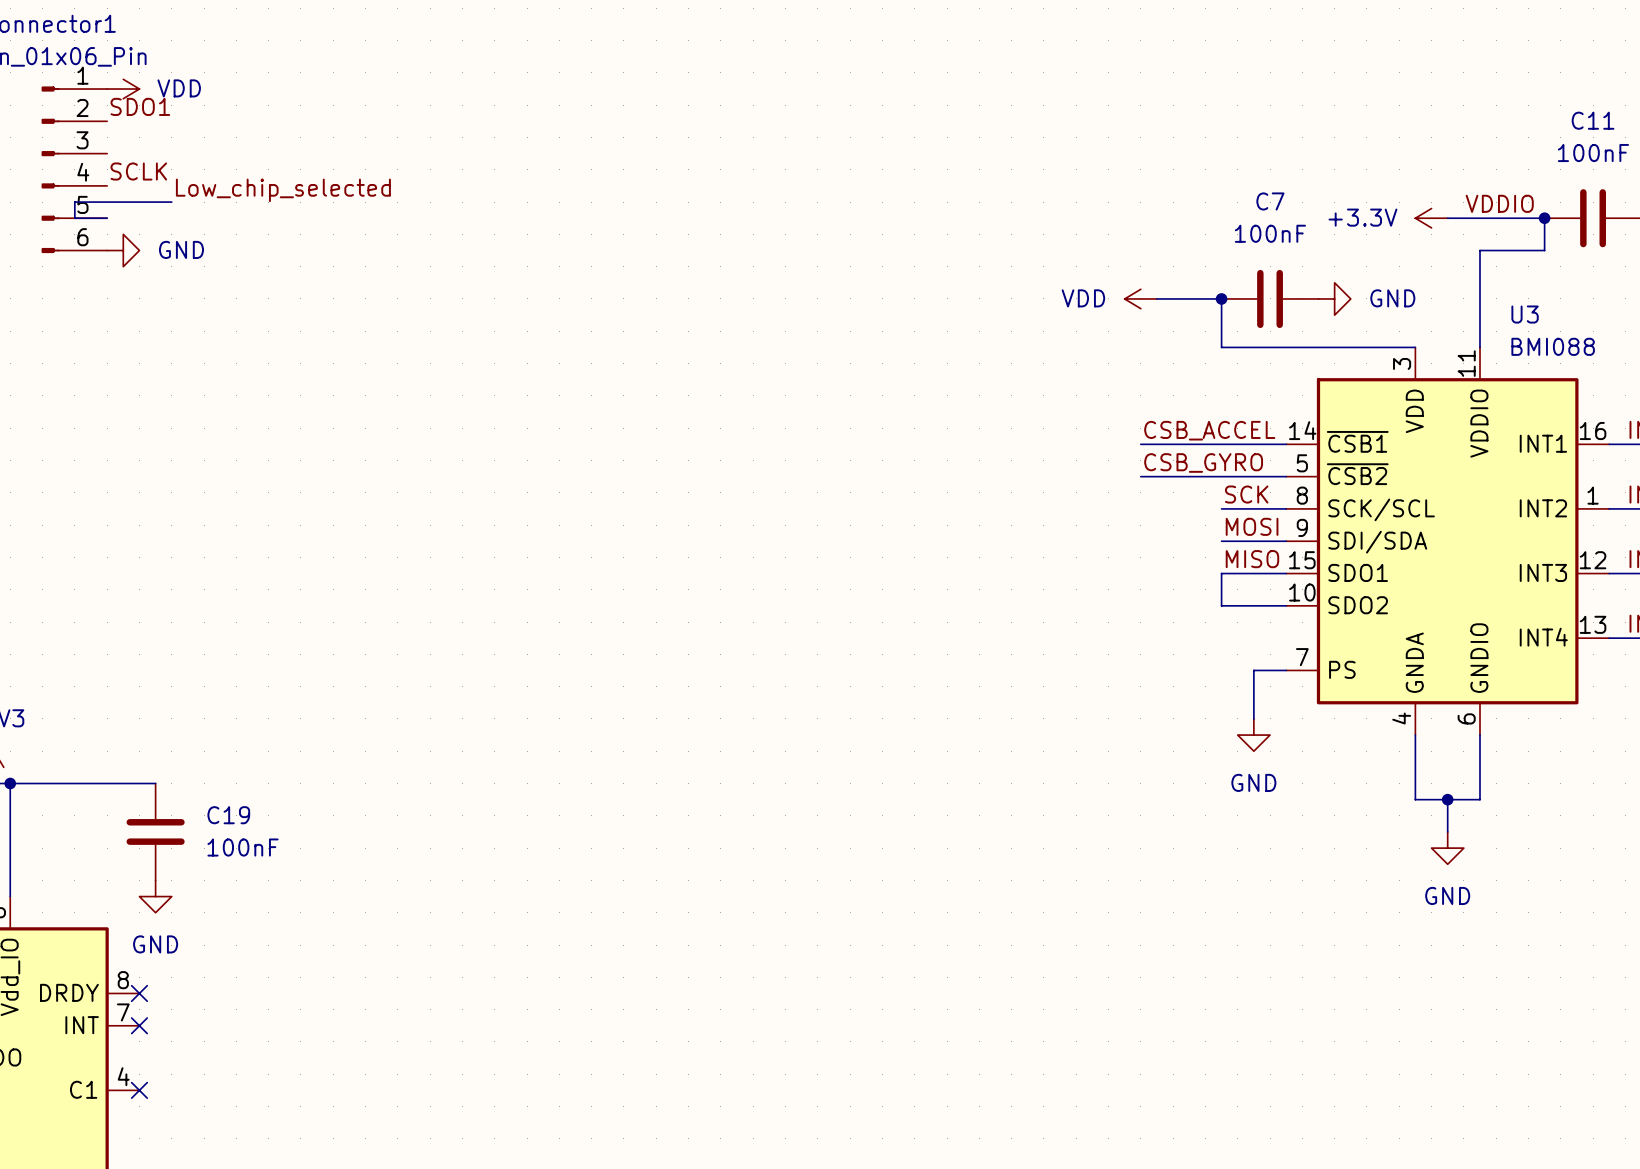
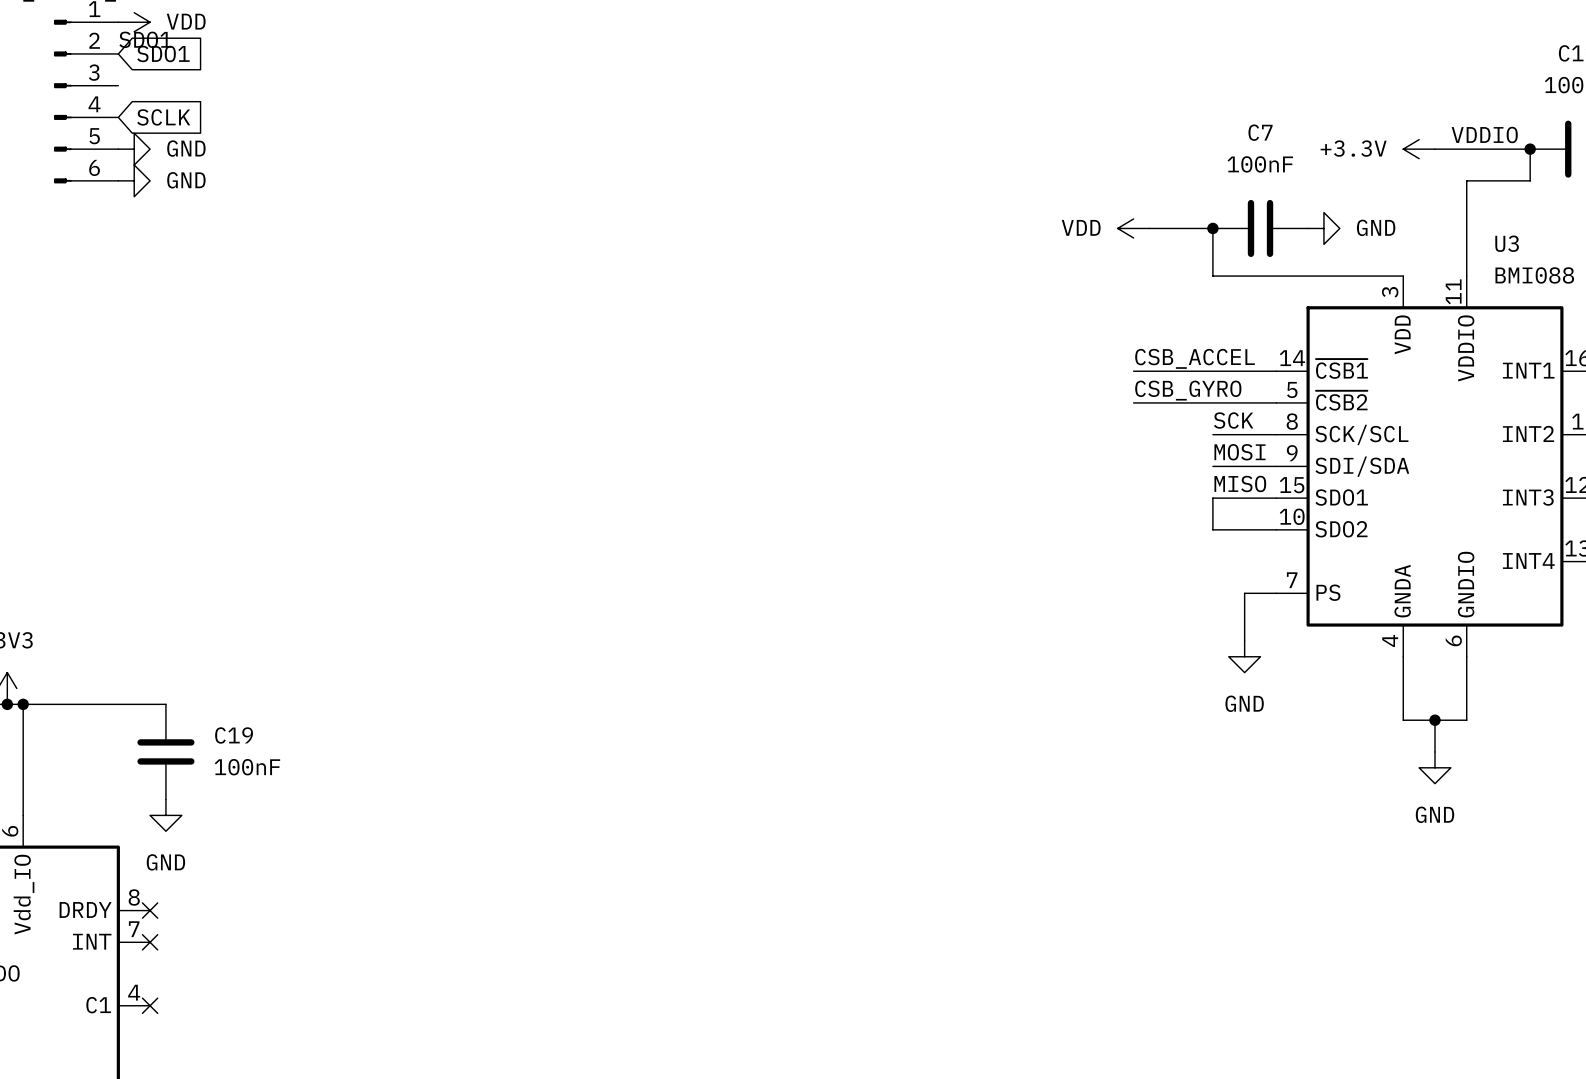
global label: none -> SDO1 (163, 53)
label: SCLK (138, 171) -> none
global label: none -> SCLK (163, 117)
label: Low_chip_selected (283, 190) -> none
wire: (171, 202) (74, 202) (74, 218) (107, 218) -> none
power symbol: none -> GND (134, 149)

